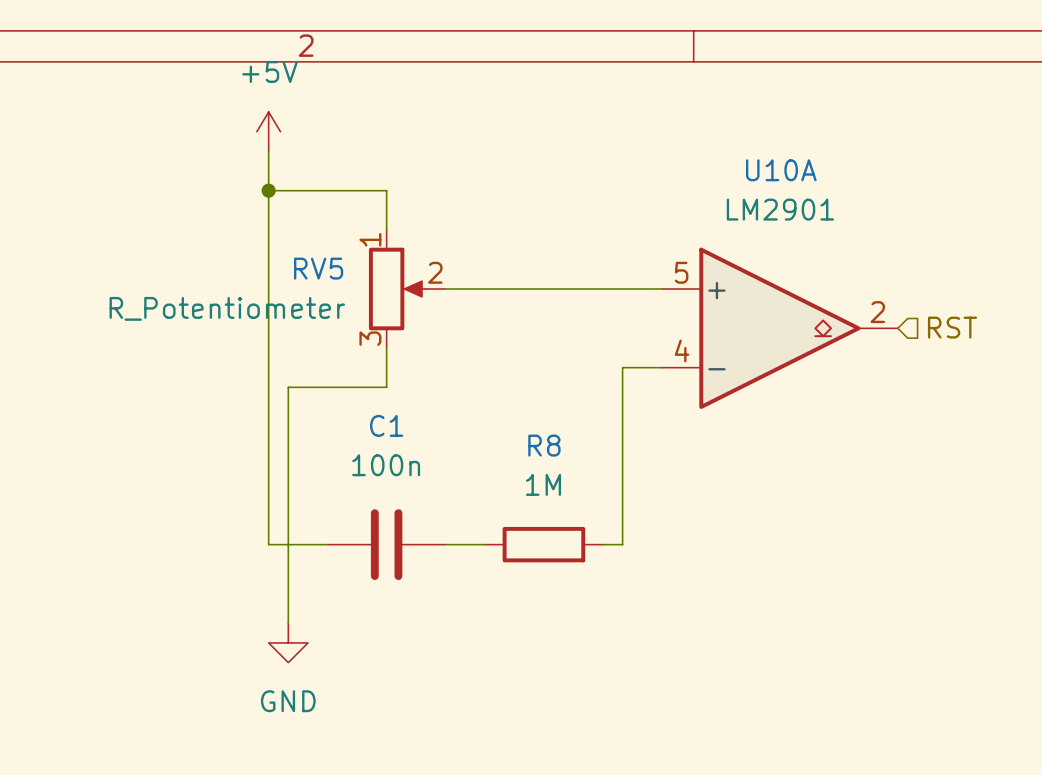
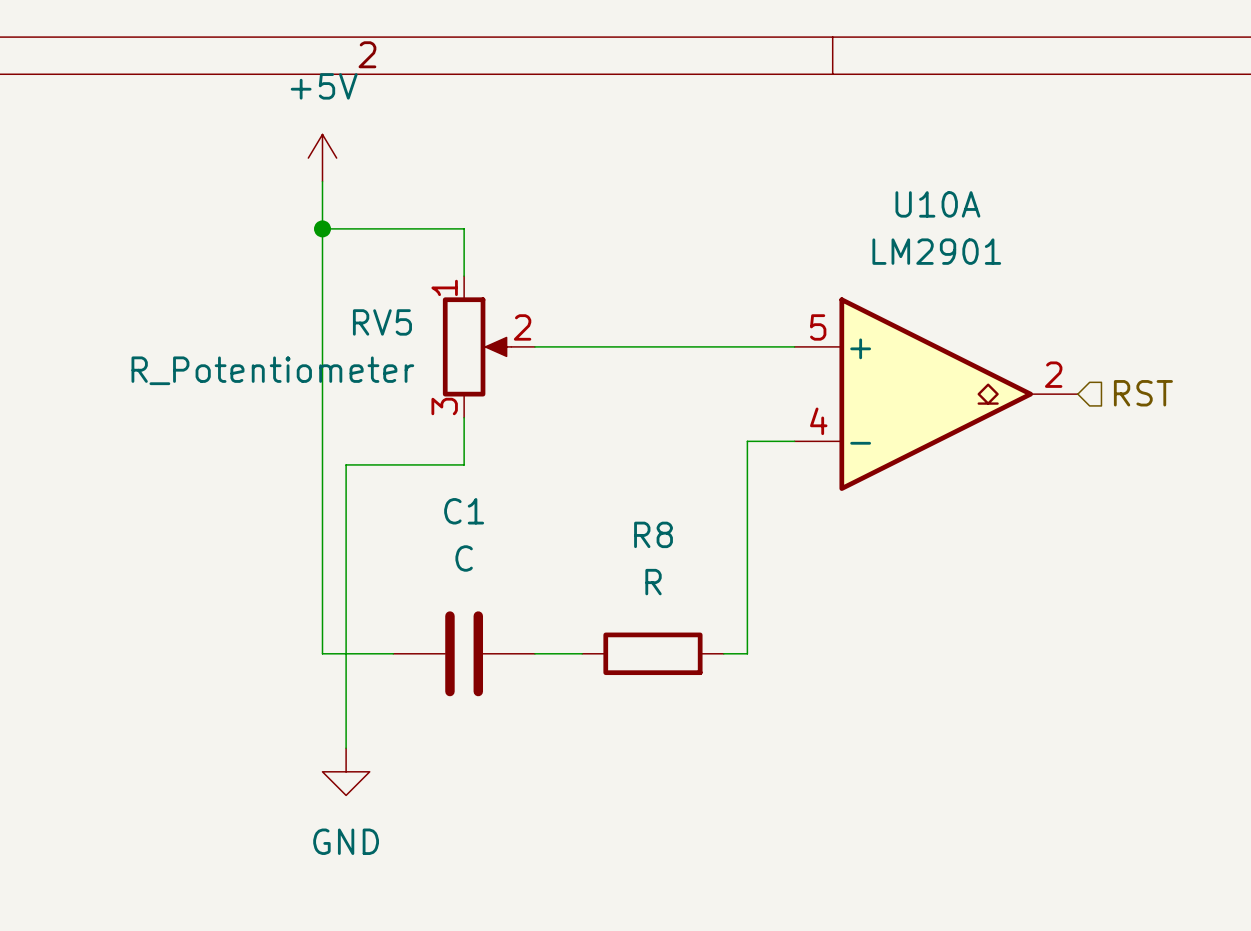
C1 value: 100n (386, 465) -> C (464, 558)
R8 value: 1M (543, 484) -> R (653, 582)

